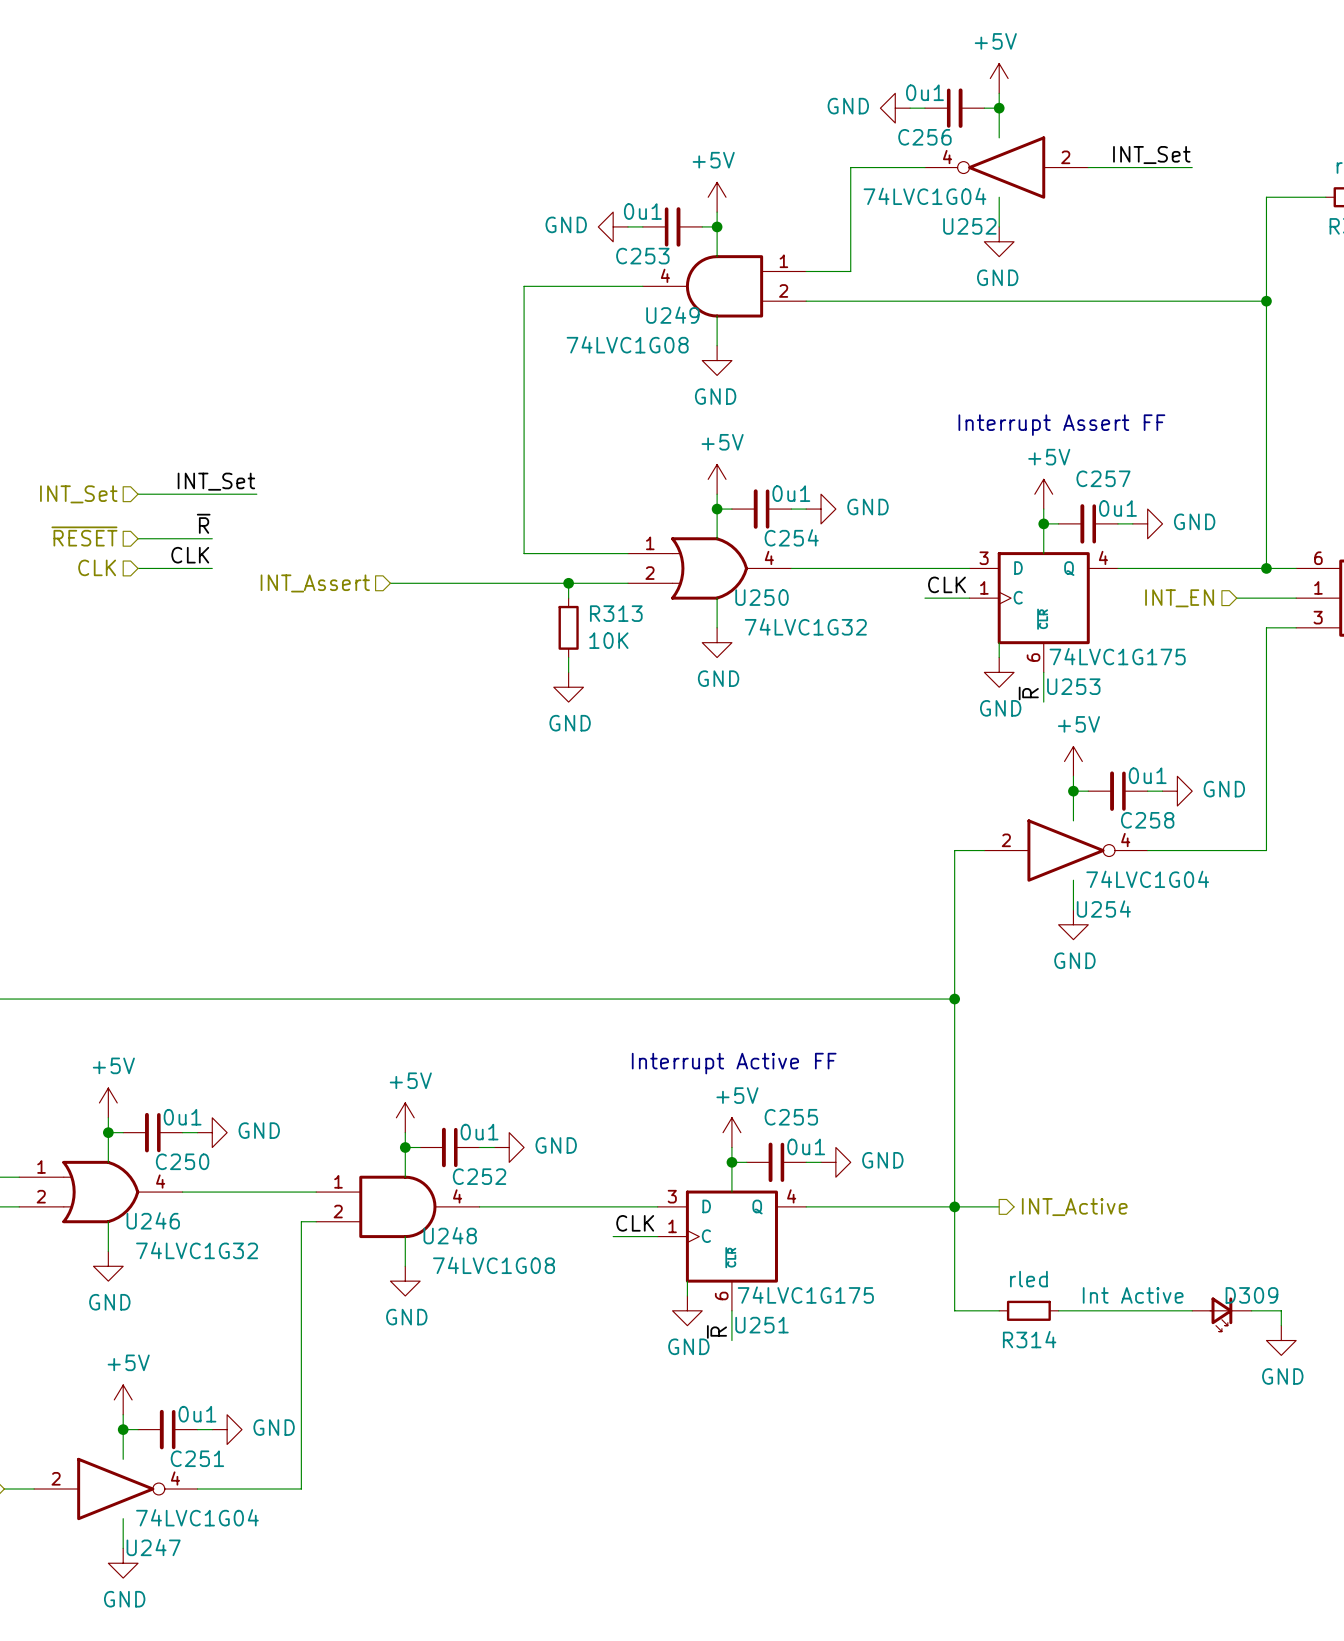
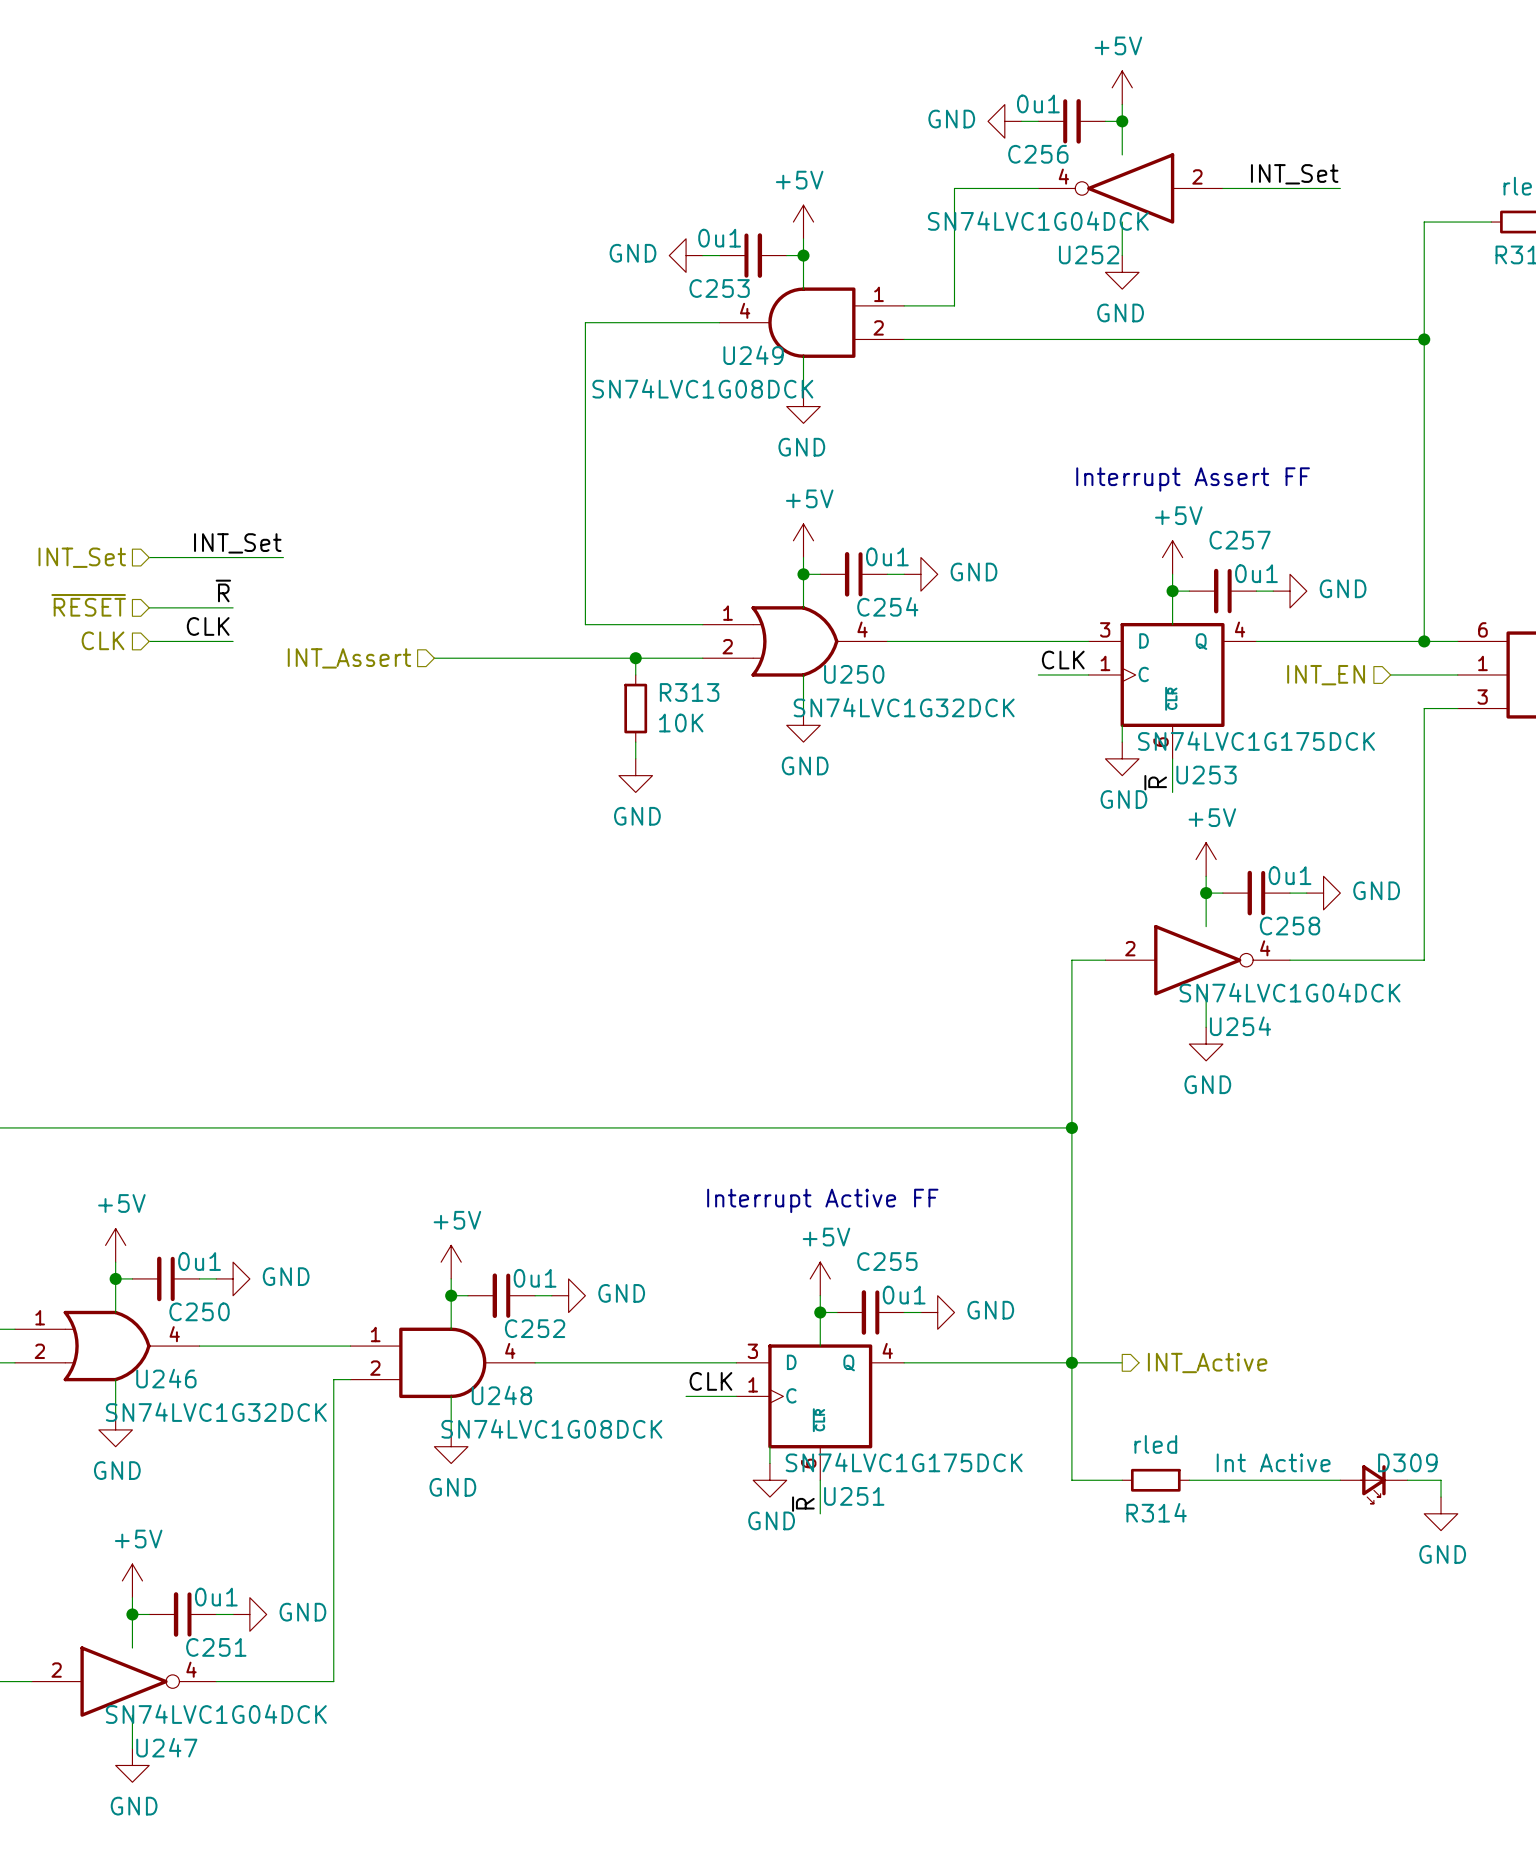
U252 value: 74LVC1G04 (924, 196) -> SN74LVC1G04DCK (1038, 220)
U249 value: 74LVC1G08 (627, 344) -> SN74LVC1G08DCK (702, 388)
U250 value: 74LVC1G32 (805, 626) -> SN74LVC1G32DCK (904, 707)
U253 value: 74LVC1G175 (1117, 656) -> SN74LVC1G175DCK (1256, 741)
U254 value: 74LVC1G04 (1147, 879) -> SN74LVC1G04DCK (1290, 992)
U246 value: 74LVC1G32 (197, 1250) -> SN74LVC1G32DCK (216, 1412)
U248 value: 74LVC1G08 (494, 1265) -> SN74LVC1G08DCK (551, 1428)
U251 value: 74LVC1G175 (805, 1295) -> SN74LVC1G175DCK (904, 1462)
U247 value: 74LVC1G04 (197, 1517) -> SN74LVC1G04DCK (216, 1714)

